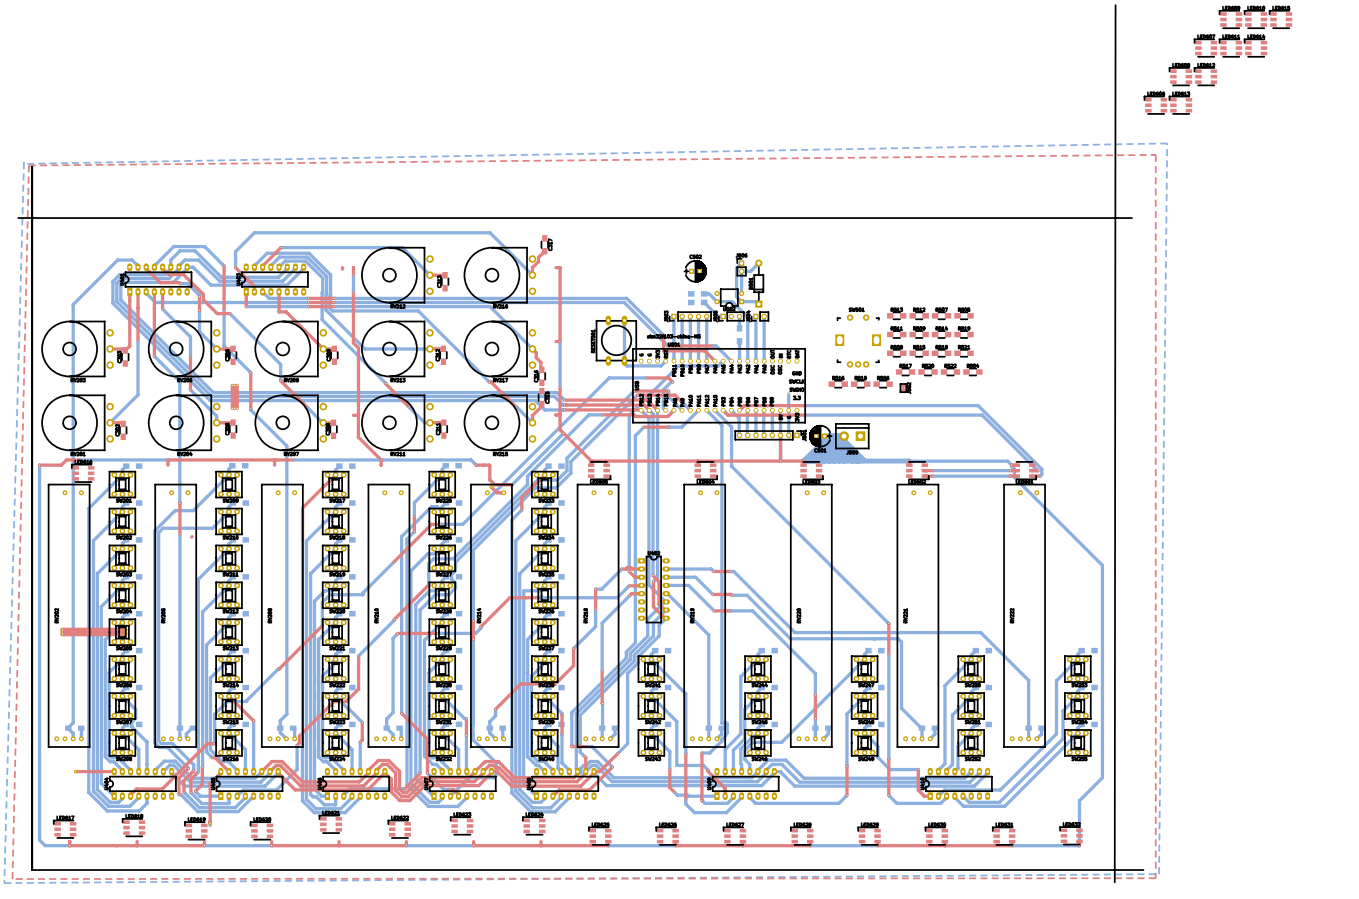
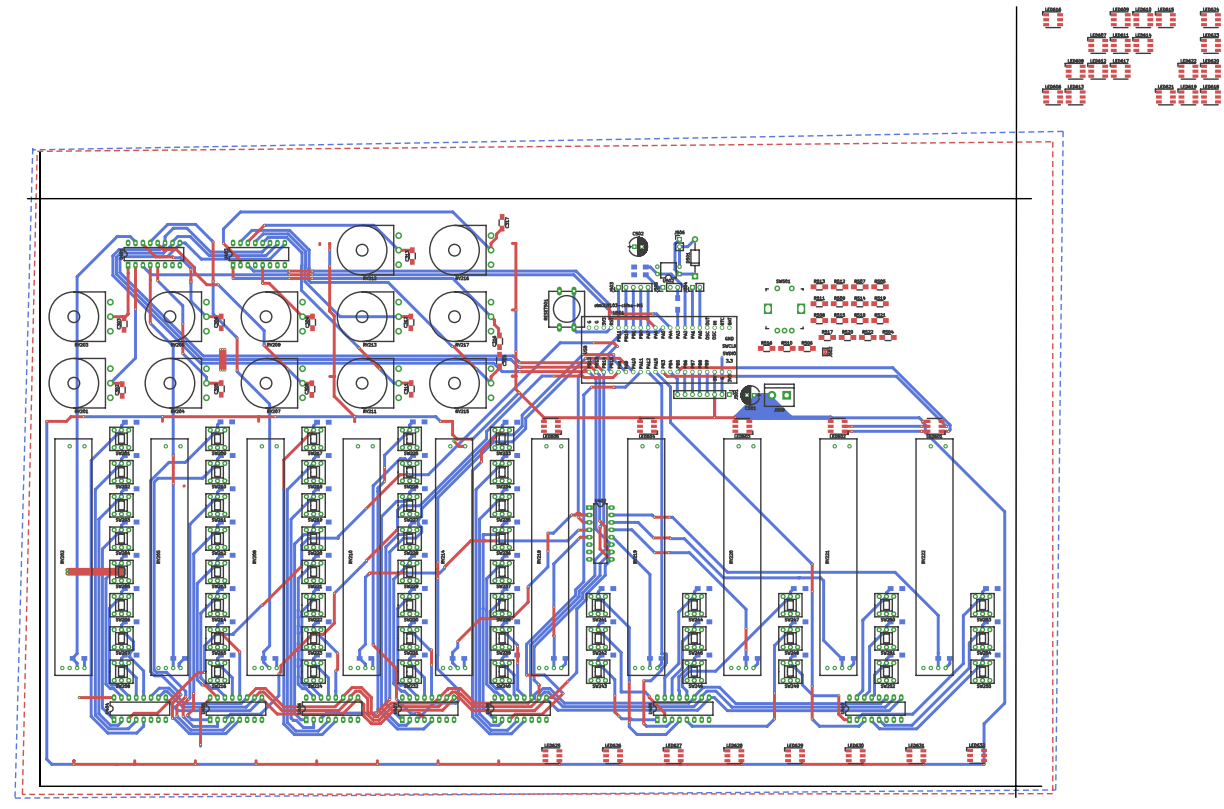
part position: (82, 473) -> (1052, 19)
part position: (330, 824) -> (1165, 96)
part position: (461, 825) -> (1210, 45)
part position: (534, 825) -> (1210, 19)
part position: (133, 827) -> (1210, 96)
part position: (64, 829) -> (1120, 71)
part position: (399, 829) -> (1188, 71)
part position: (196, 830) -> (1188, 96)
part position: (261, 830) -> (1210, 71)

